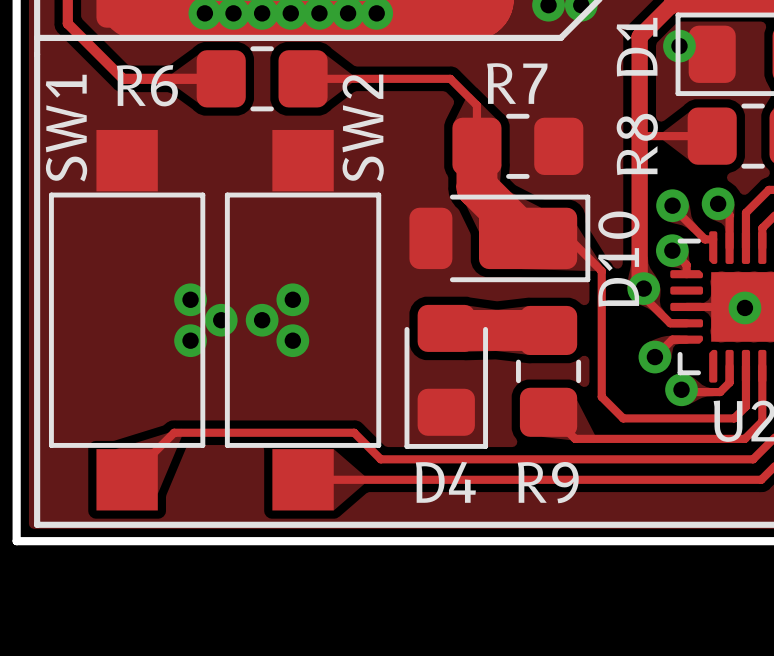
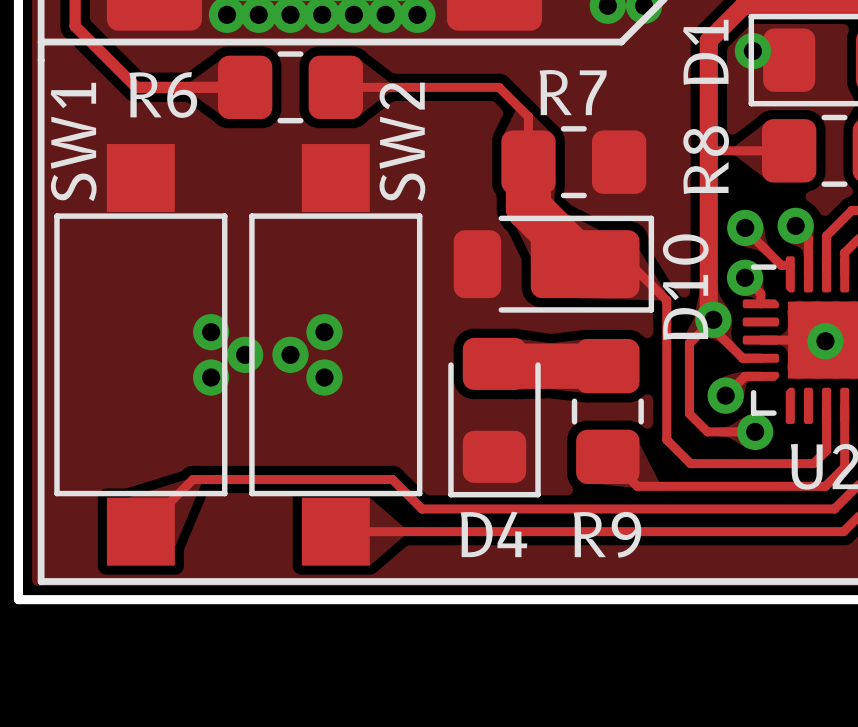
track: (729, 366) (729, 382) (720, 392) (683, 392) (681, 389) -> (713, 319) (689, 343) (689, 413) (707, 431) (755, 431)

